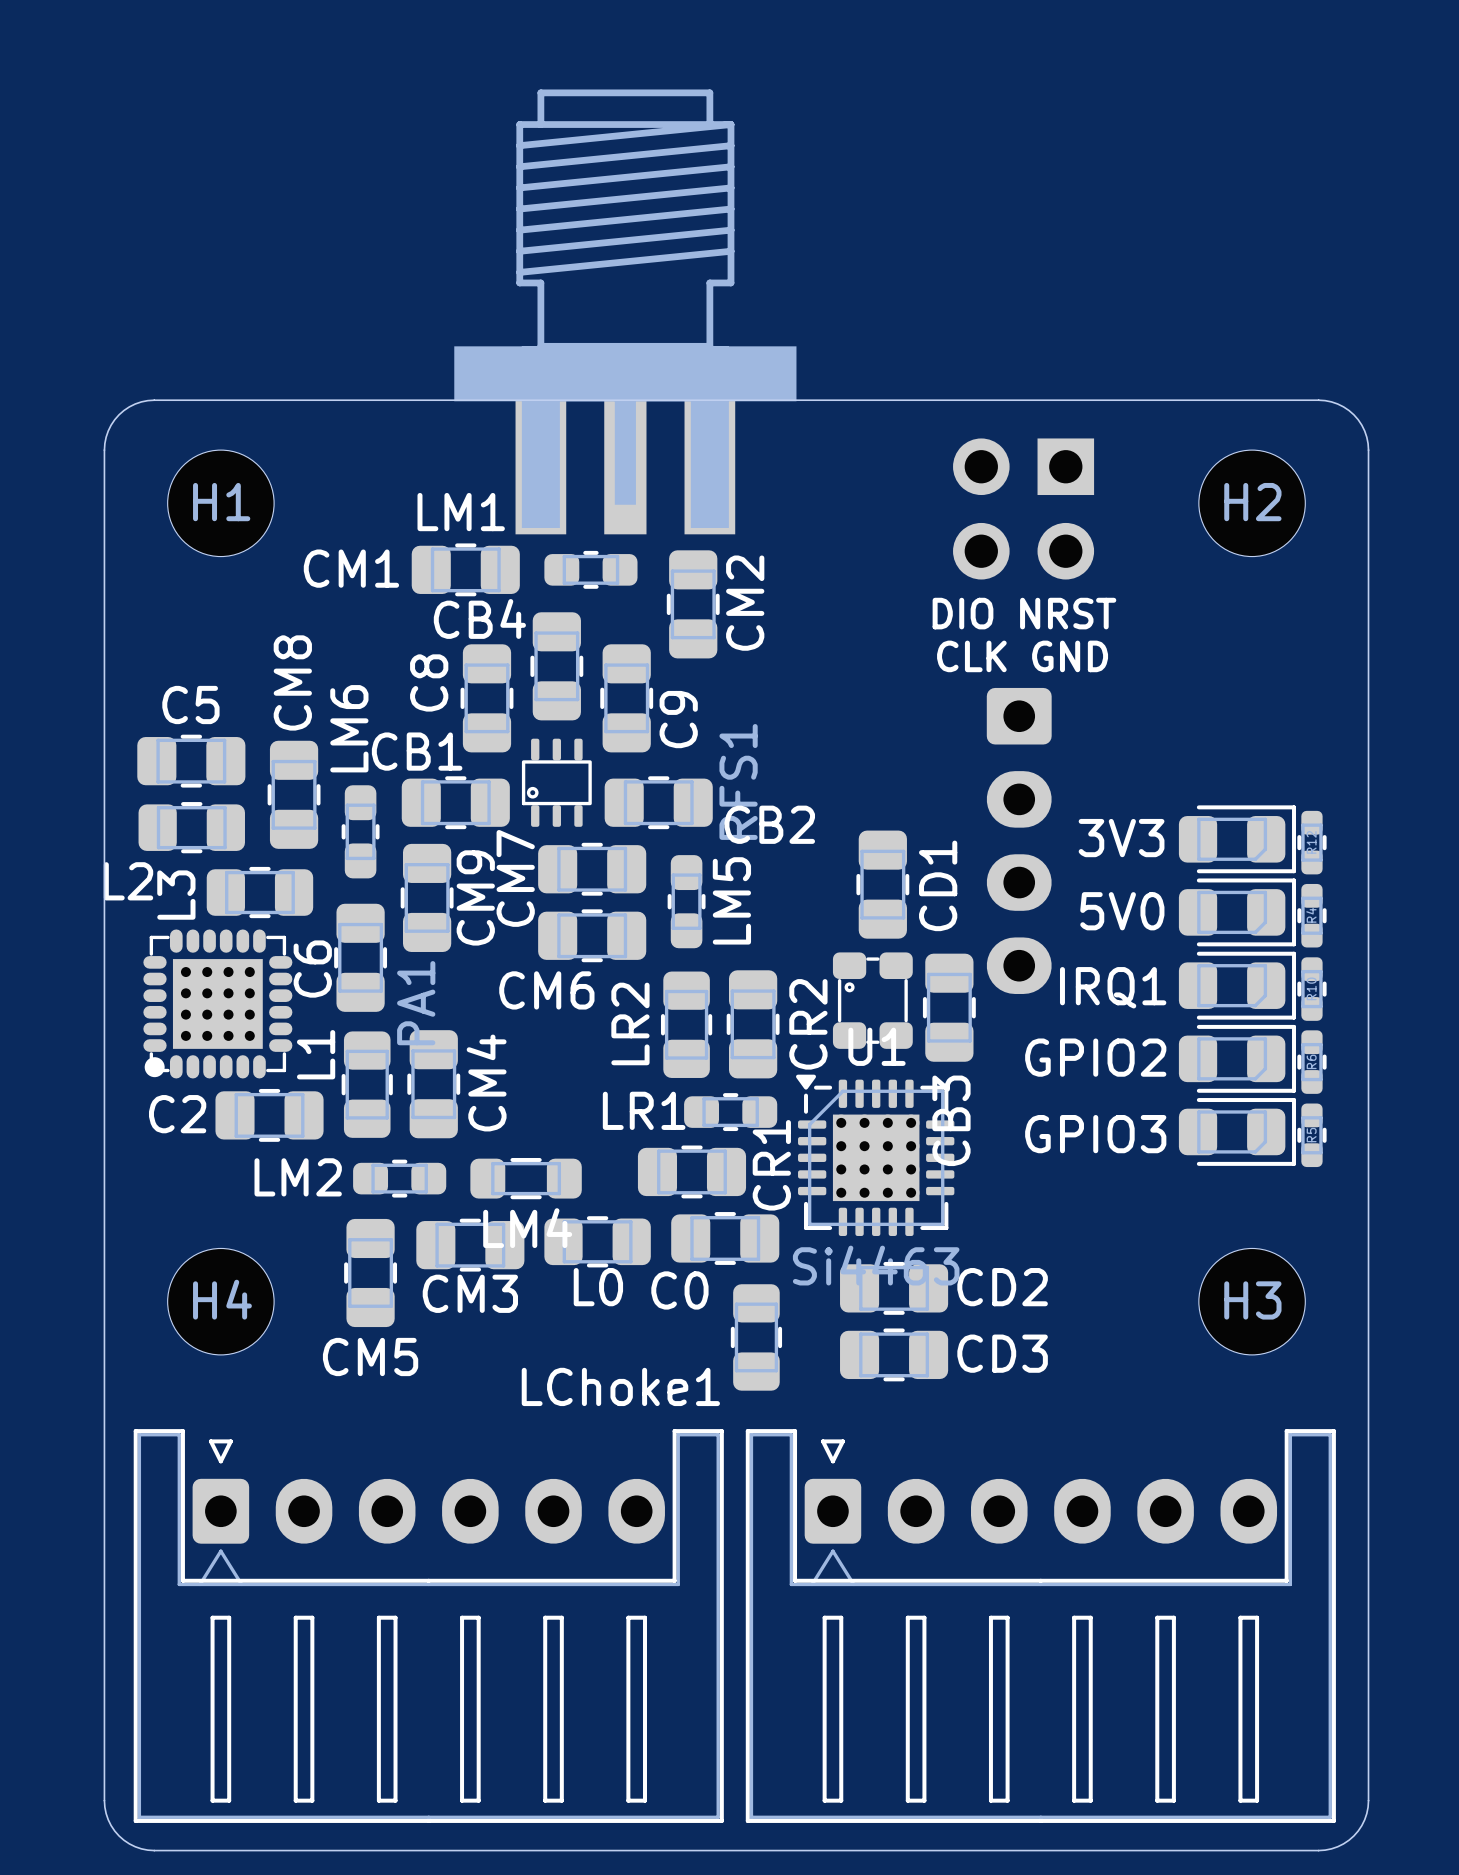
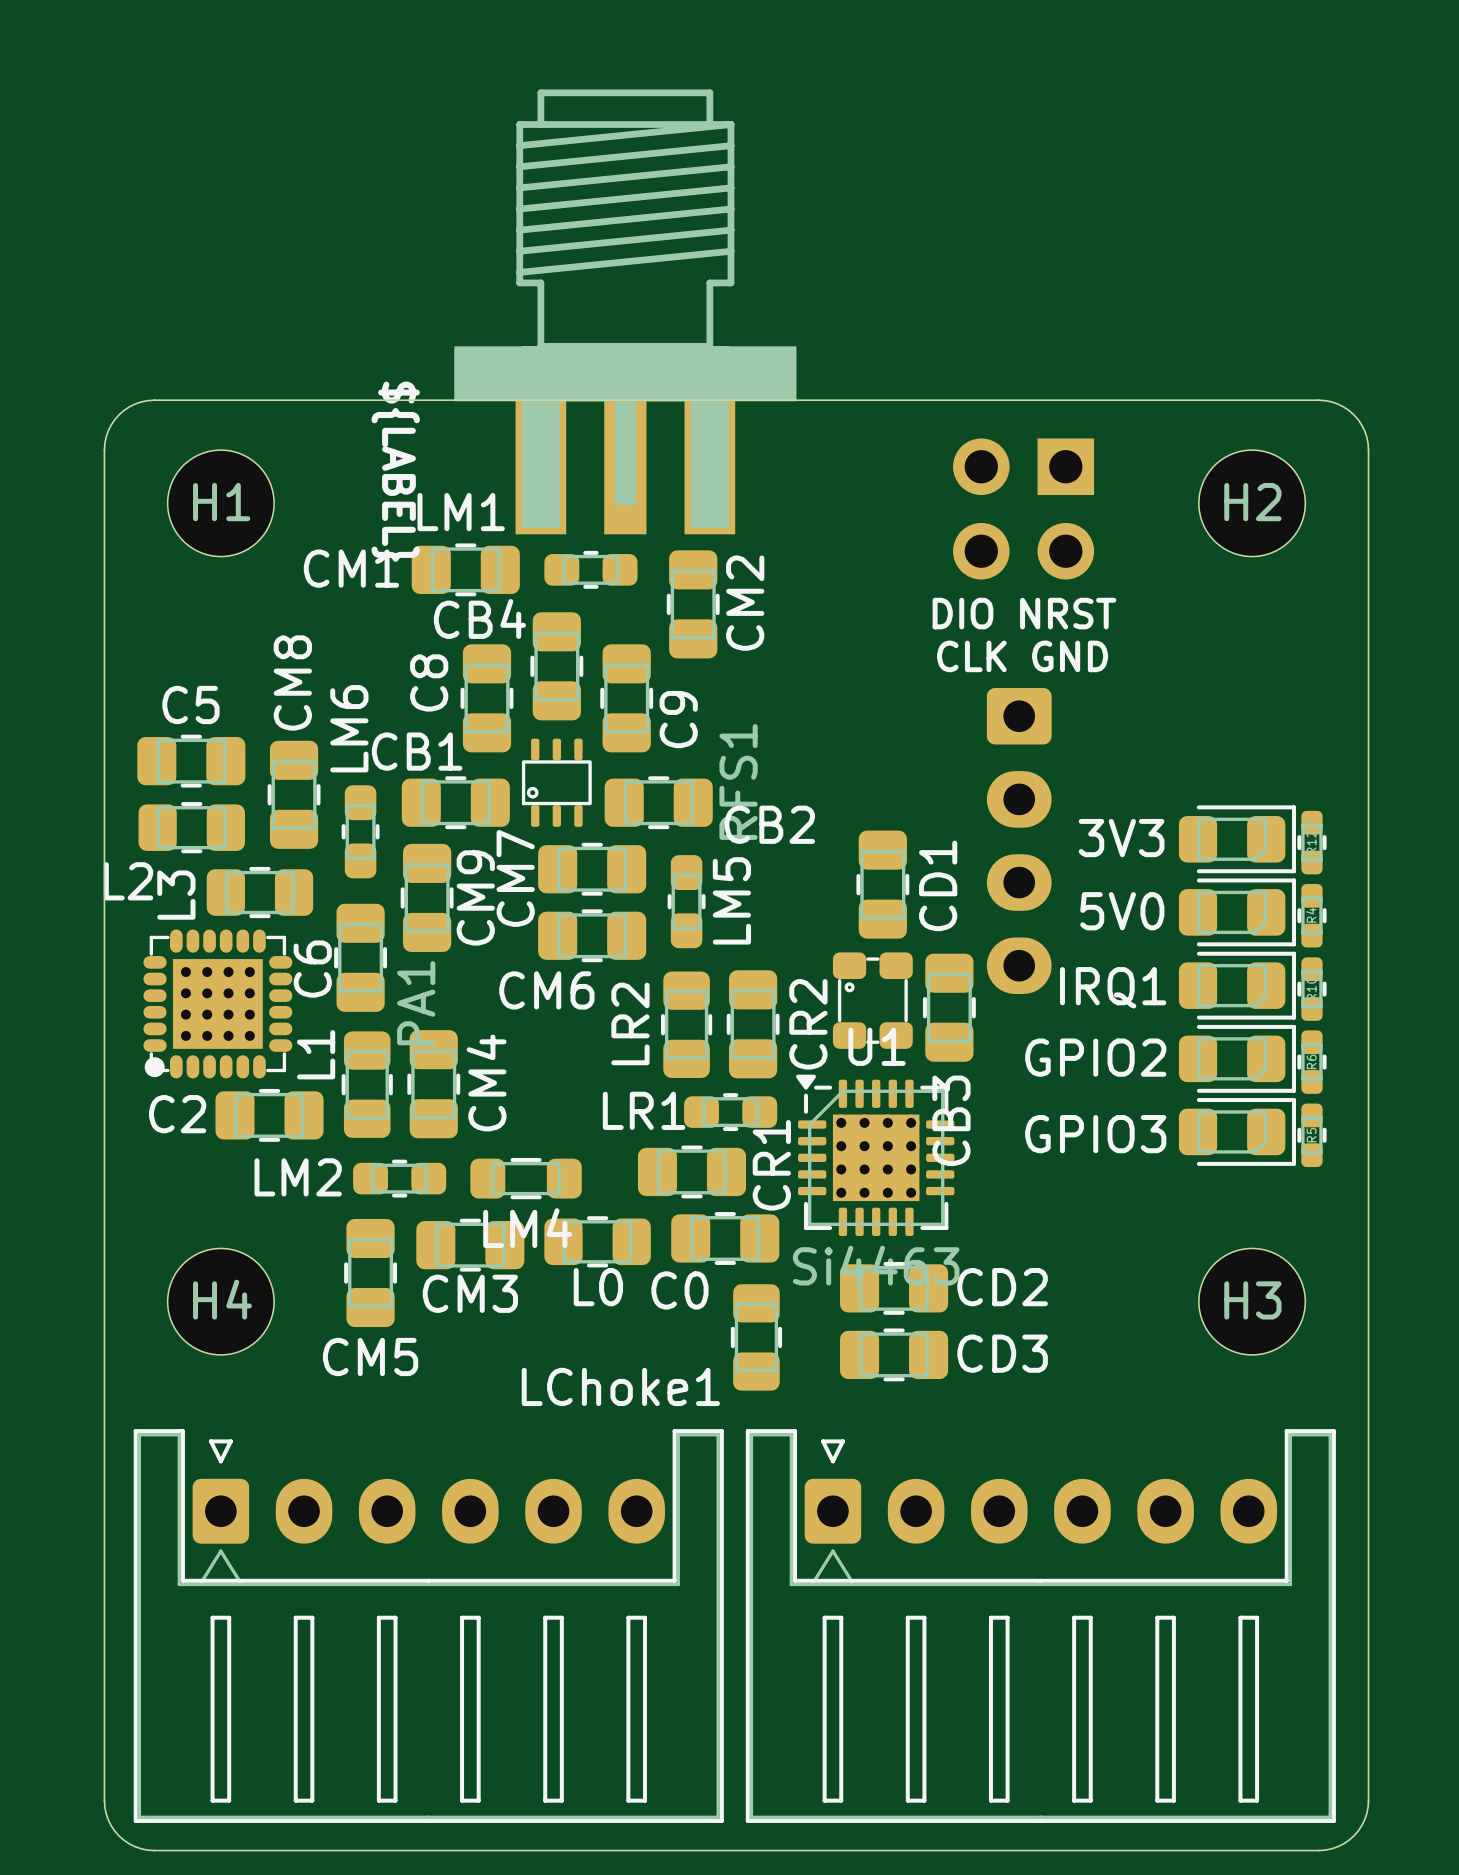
part text: none -> ${LABEL} (395, 471)

